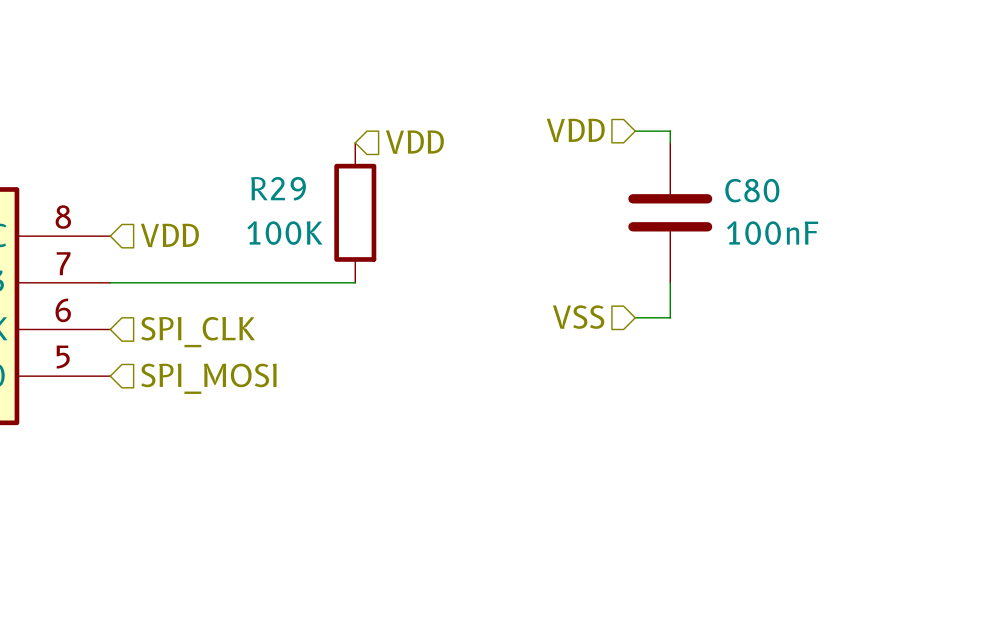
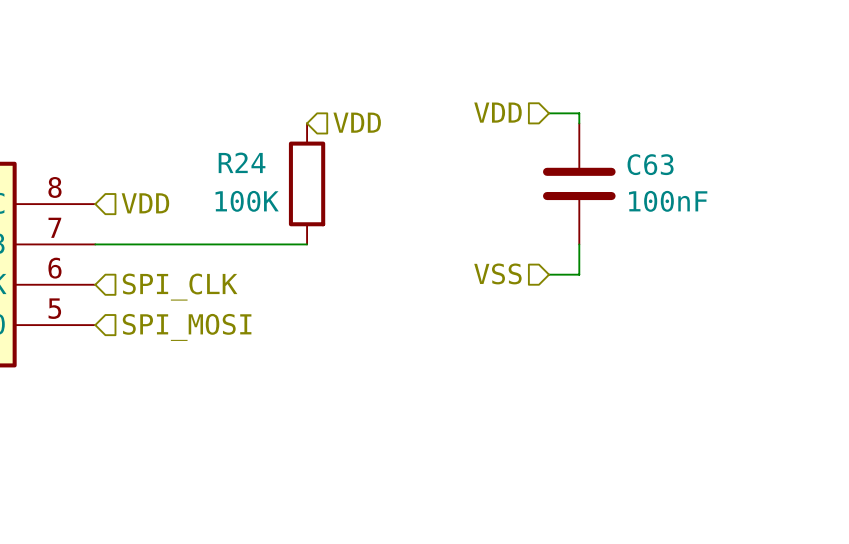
R29 name: R29 (278, 188) -> R24 (242, 162)
C80 name: C80 (752, 190) -> C63 (650, 164)

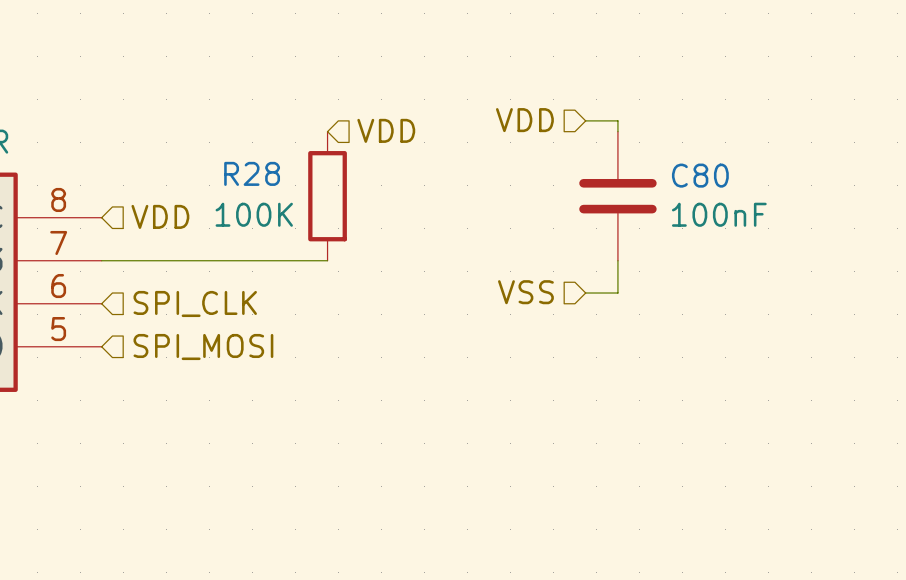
R24 name: R24 (242, 162) -> R28 (252, 173)
C63 name: C63 (650, 164) -> C80 (700, 175)

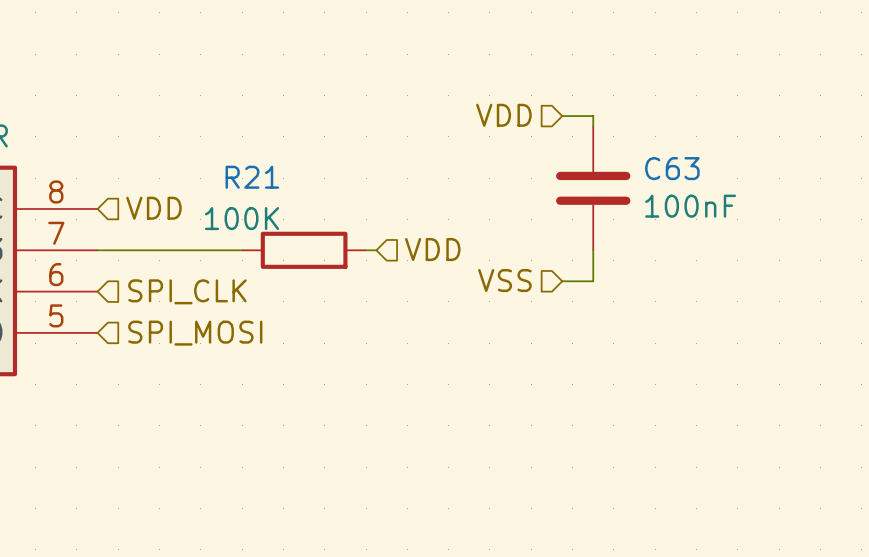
hierarchical label position: VDD (386, 130) -> VDD (432, 249)
C80 name: C80 (700, 175) -> C63 (672, 168)
R28: 100K (327, 196) -> none
wire: (252, 260) (327, 260) -> none
R21: none -> 100K (304, 250)
wire: none -> (366, 250) (376, 250)

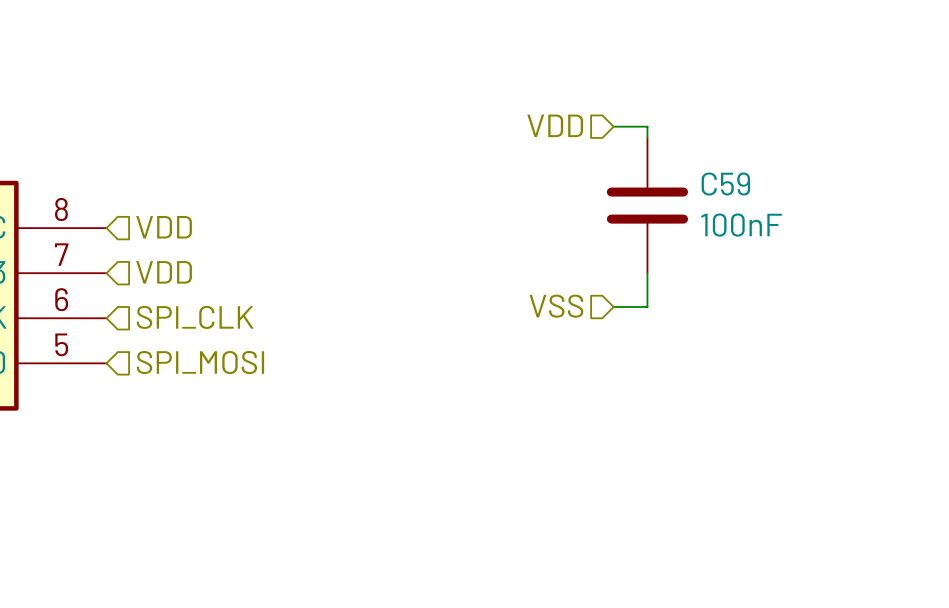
C63 name: C63 (672, 168) -> C59 (725, 184)
hierarchical label position: VDD (432, 249) -> VDD (164, 272)
wire: (97, 250) (242, 250) -> none
R21: 100K (304, 250) -> none
wire: (366, 250) (376, 250) -> none

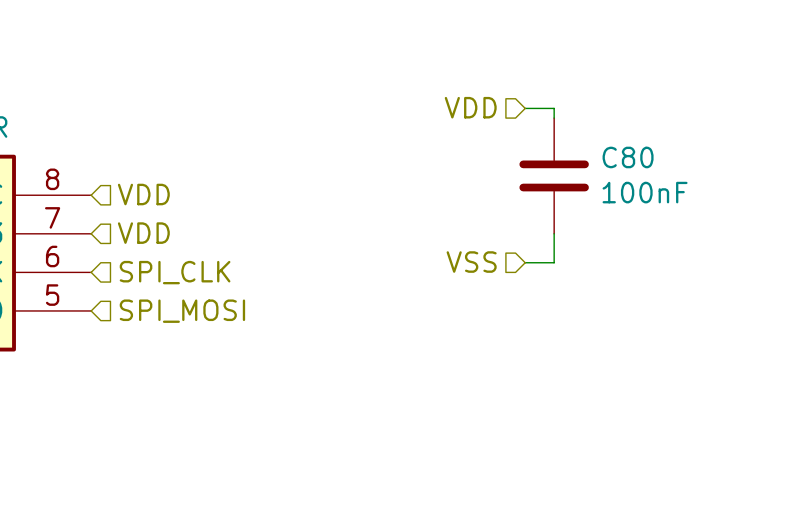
C59 name: C59 (725, 184) -> C80 (628, 157)

